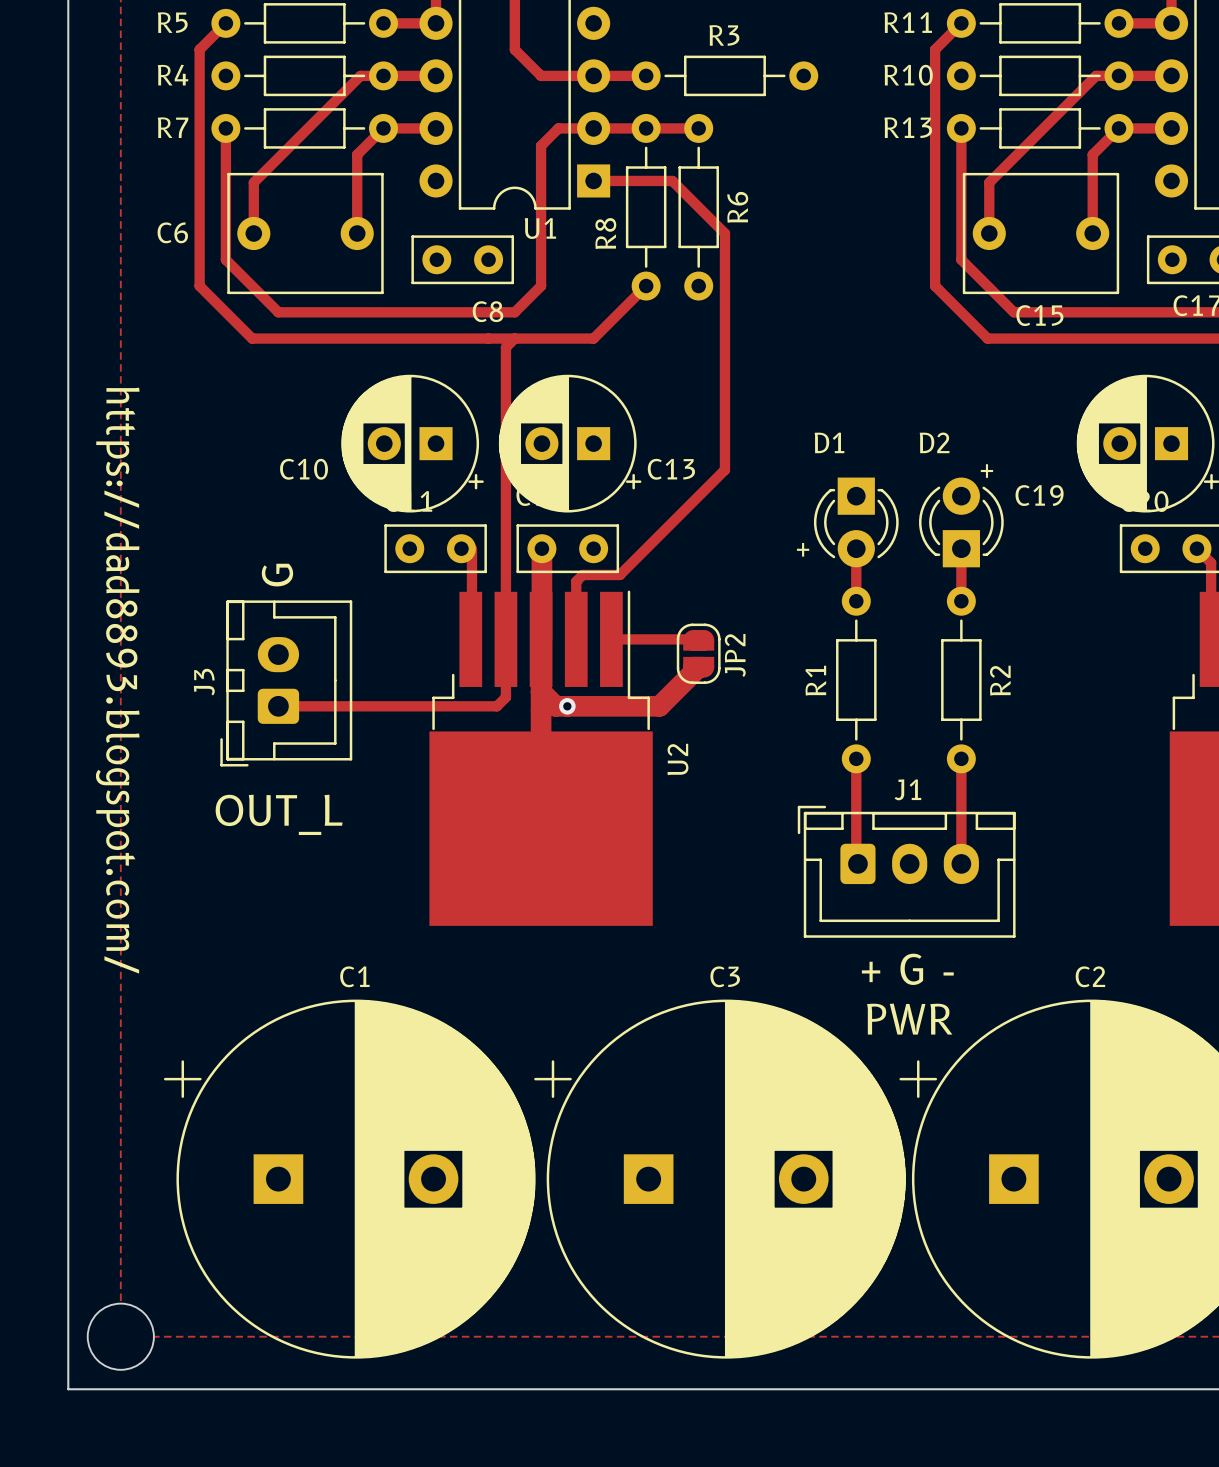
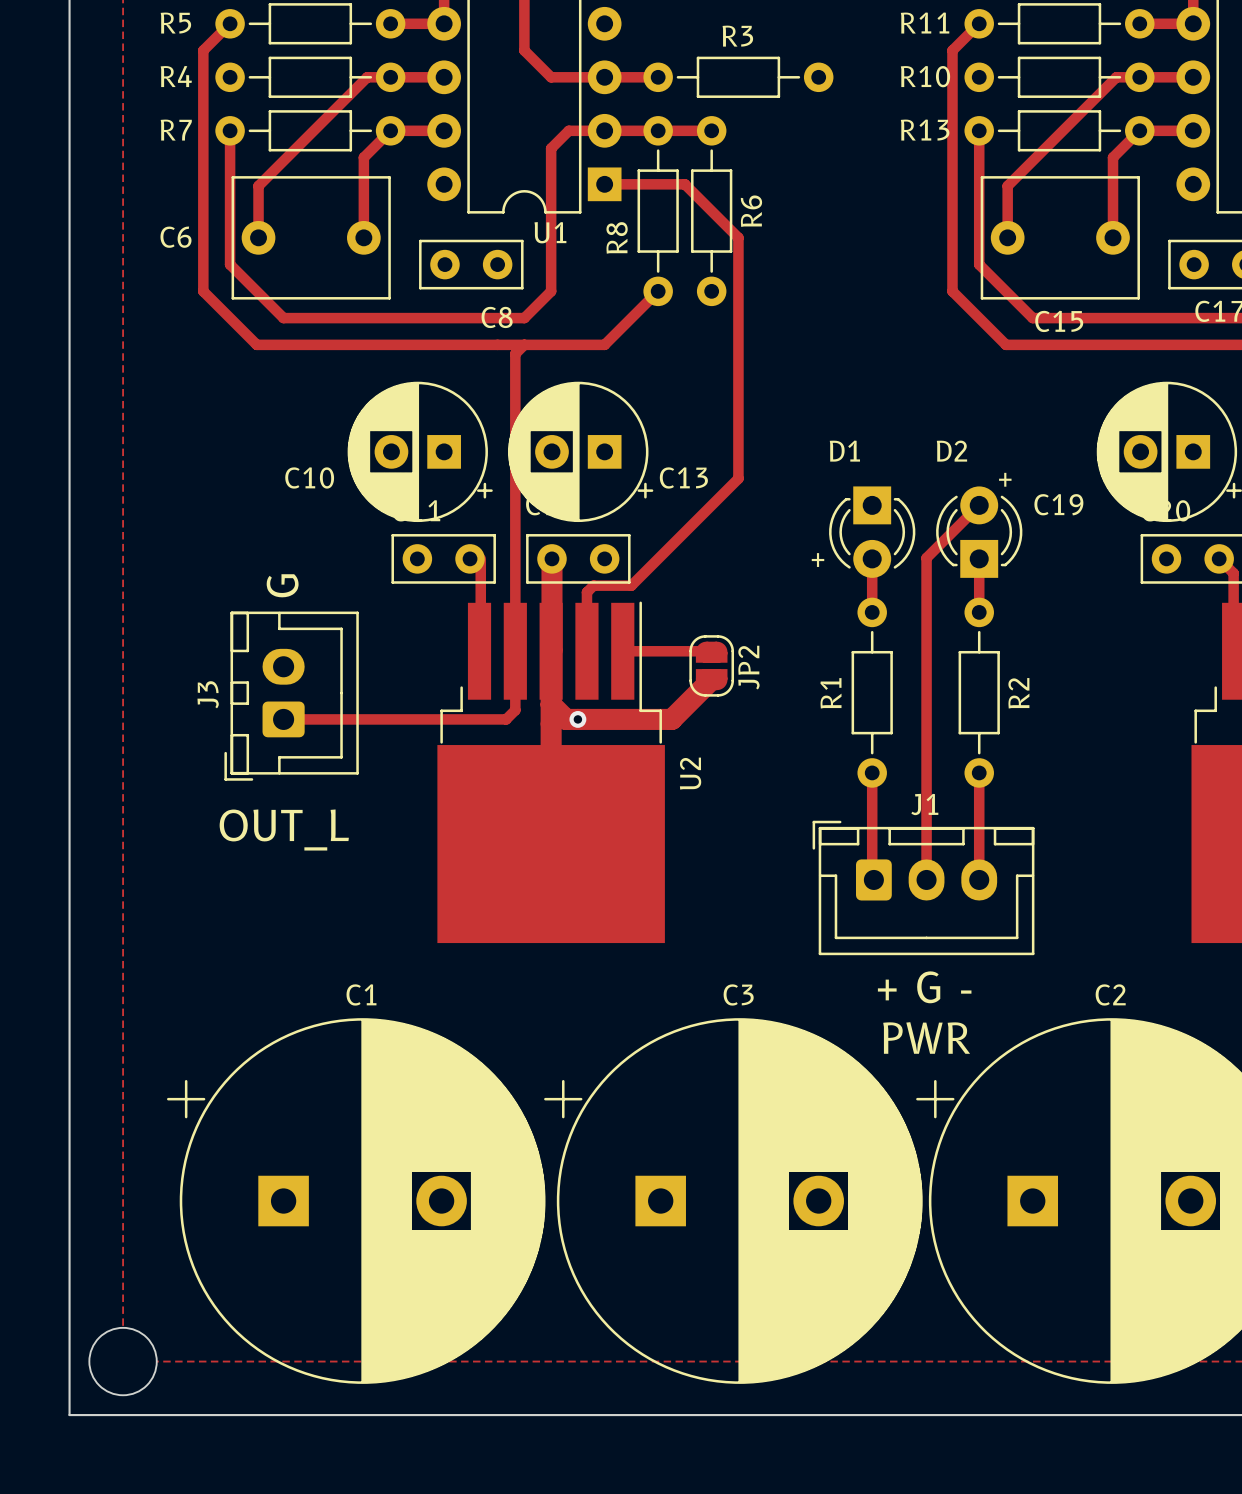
track: none -> (979, 505) (926, 558) (926, 879)
text: https://dad8893.blogspot.com/ (117, 680) -> none

